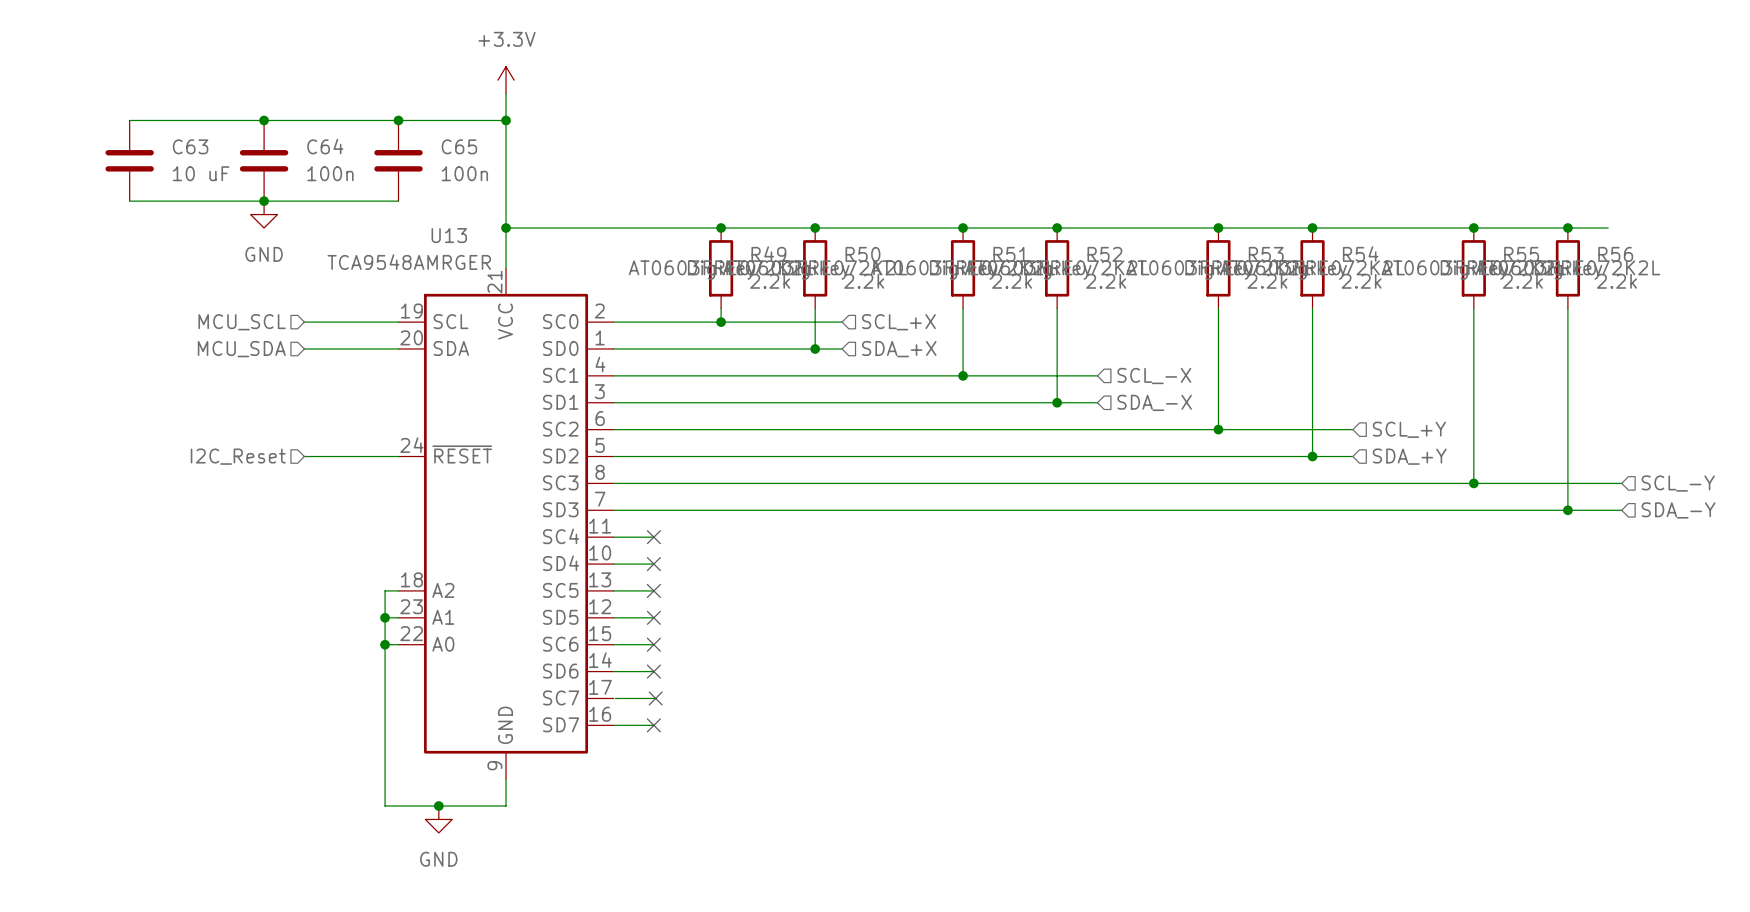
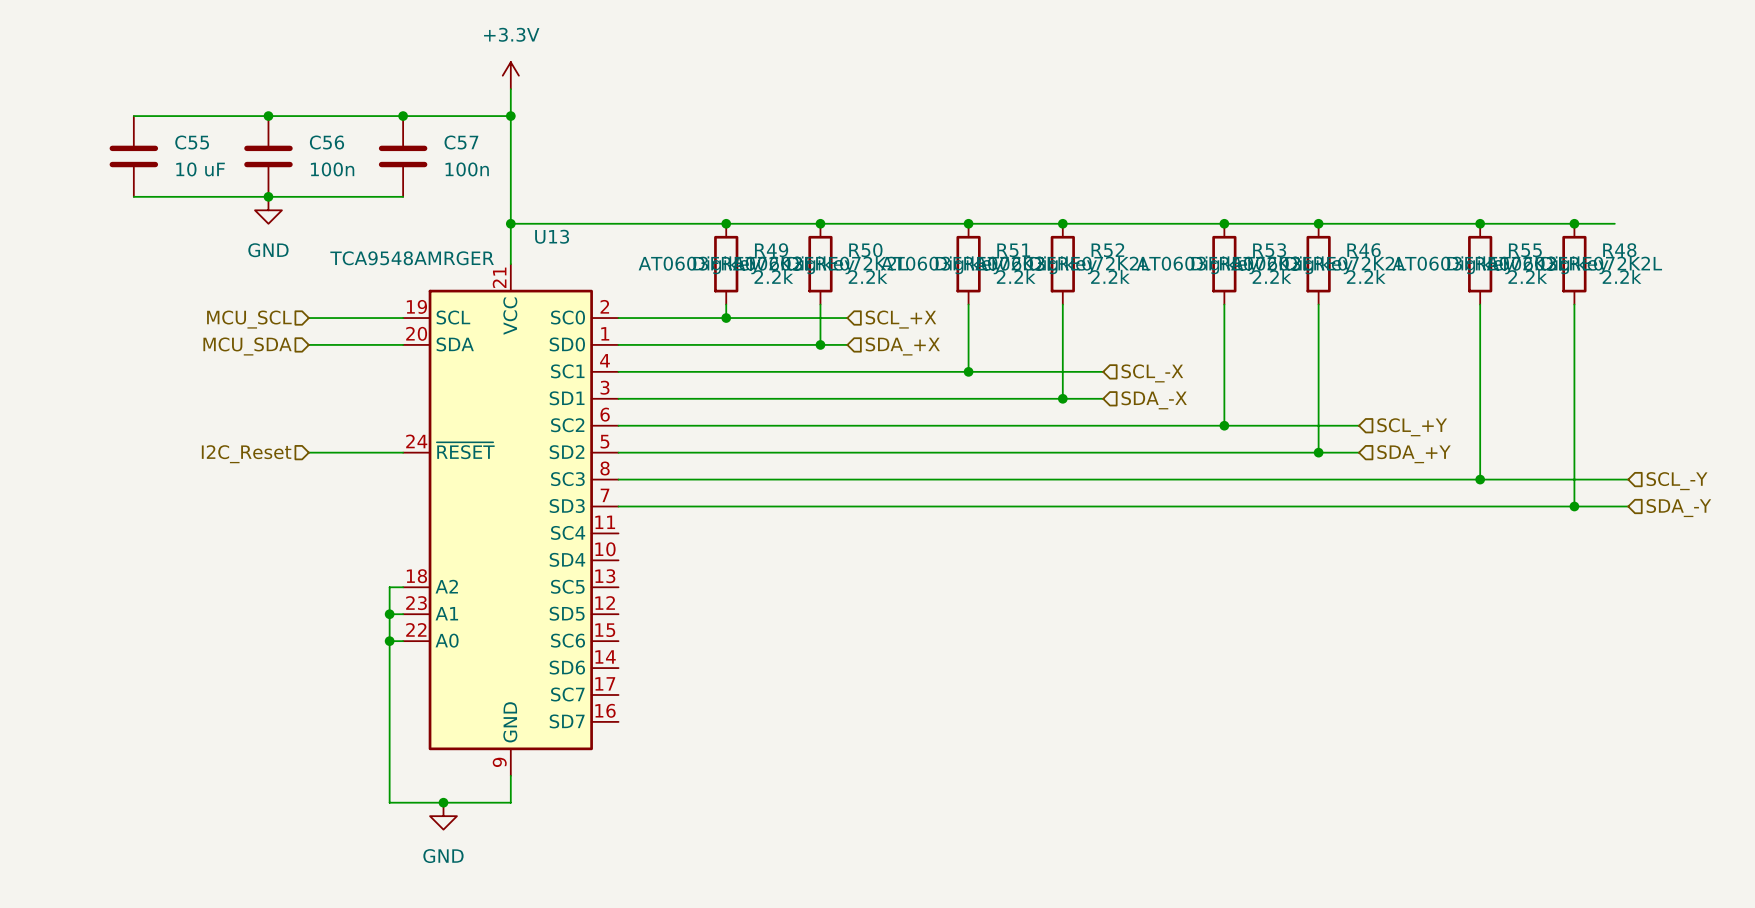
C63 name: C63 (190, 146) -> C55 (192, 142)
C64 name: C64 (325, 146) -> C56 (326, 142)
C65 name: C65 (459, 146) -> C57 (461, 142)
U13 name position: U13 (449, 235) -> U13 (552, 236)
R54 name: R54 (1360, 254) -> R46 (1364, 250)
R56 name: R56 (1615, 254) -> R48 (1619, 250)
wire: (613, 537) (653, 537) -> none
no-connect mark: (653, 537) -> none
wire: (613, 564) (653, 564) -> none
no-connect mark: (653, 564) -> none
wire: (613, 590) (653, 590) -> none
no-connect mark: (653, 590) -> none
wire: (613, 617) (653, 617) -> none
no-connect mark: (653, 617) -> none
wire: (613, 644) (653, 644) -> none
no-connect mark: (653, 644) -> none
wire: (613, 671) (653, 671) -> none
no-connect mark: (653, 671) -> none
wire: (615, 698) (655, 698) -> none
no-connect mark: (655, 698) -> none
wire: (613, 725) (653, 725) -> none
no-connect mark: (653, 725) -> none

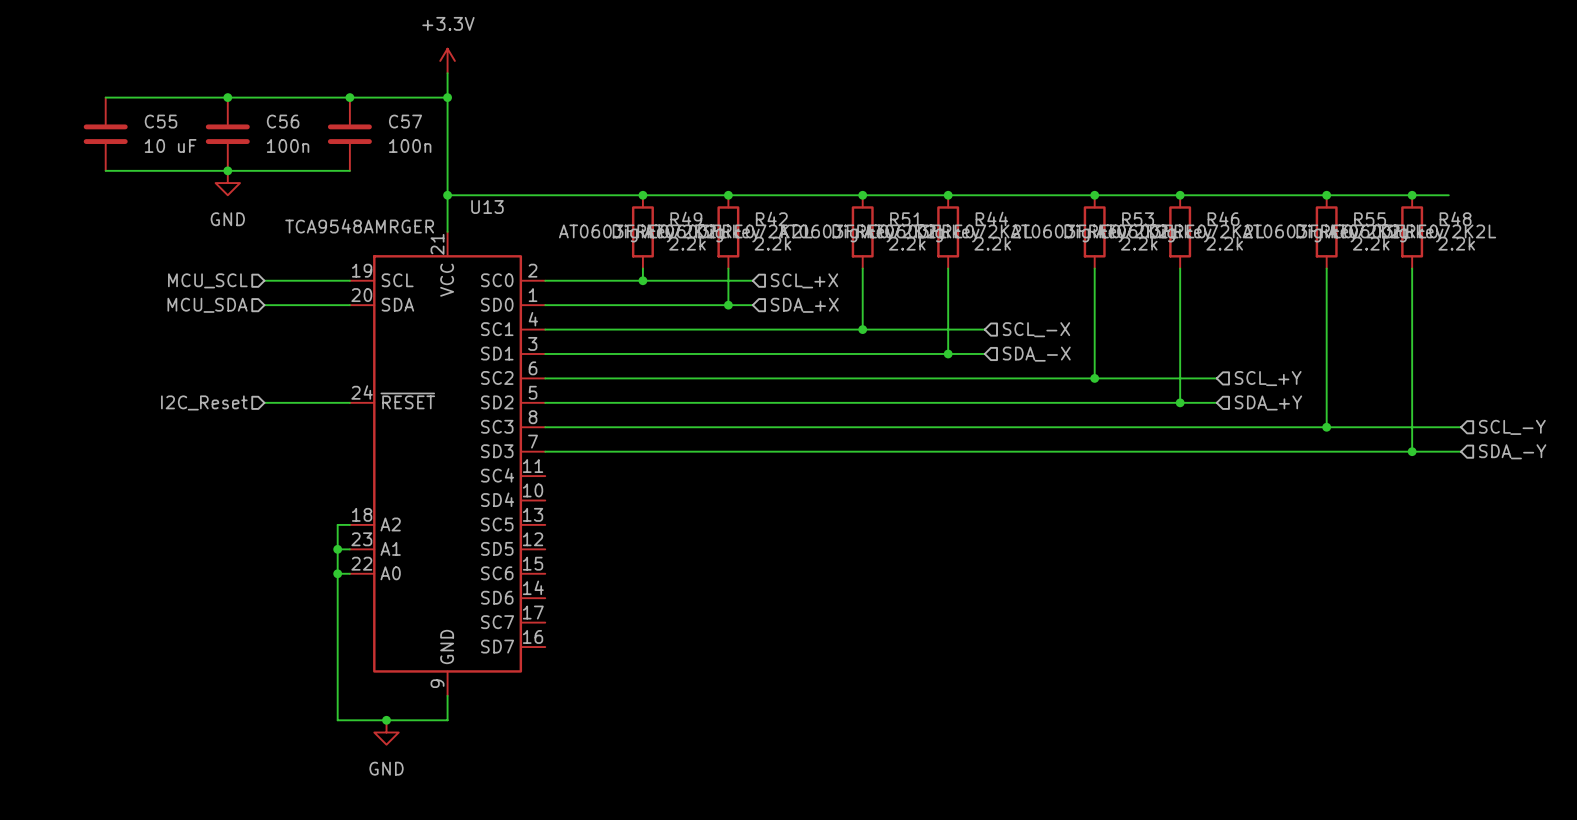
R50 name: R50 (865, 250) -> R42 (771, 218)
R52 name: R52 (1107, 250) -> R44 (991, 218)

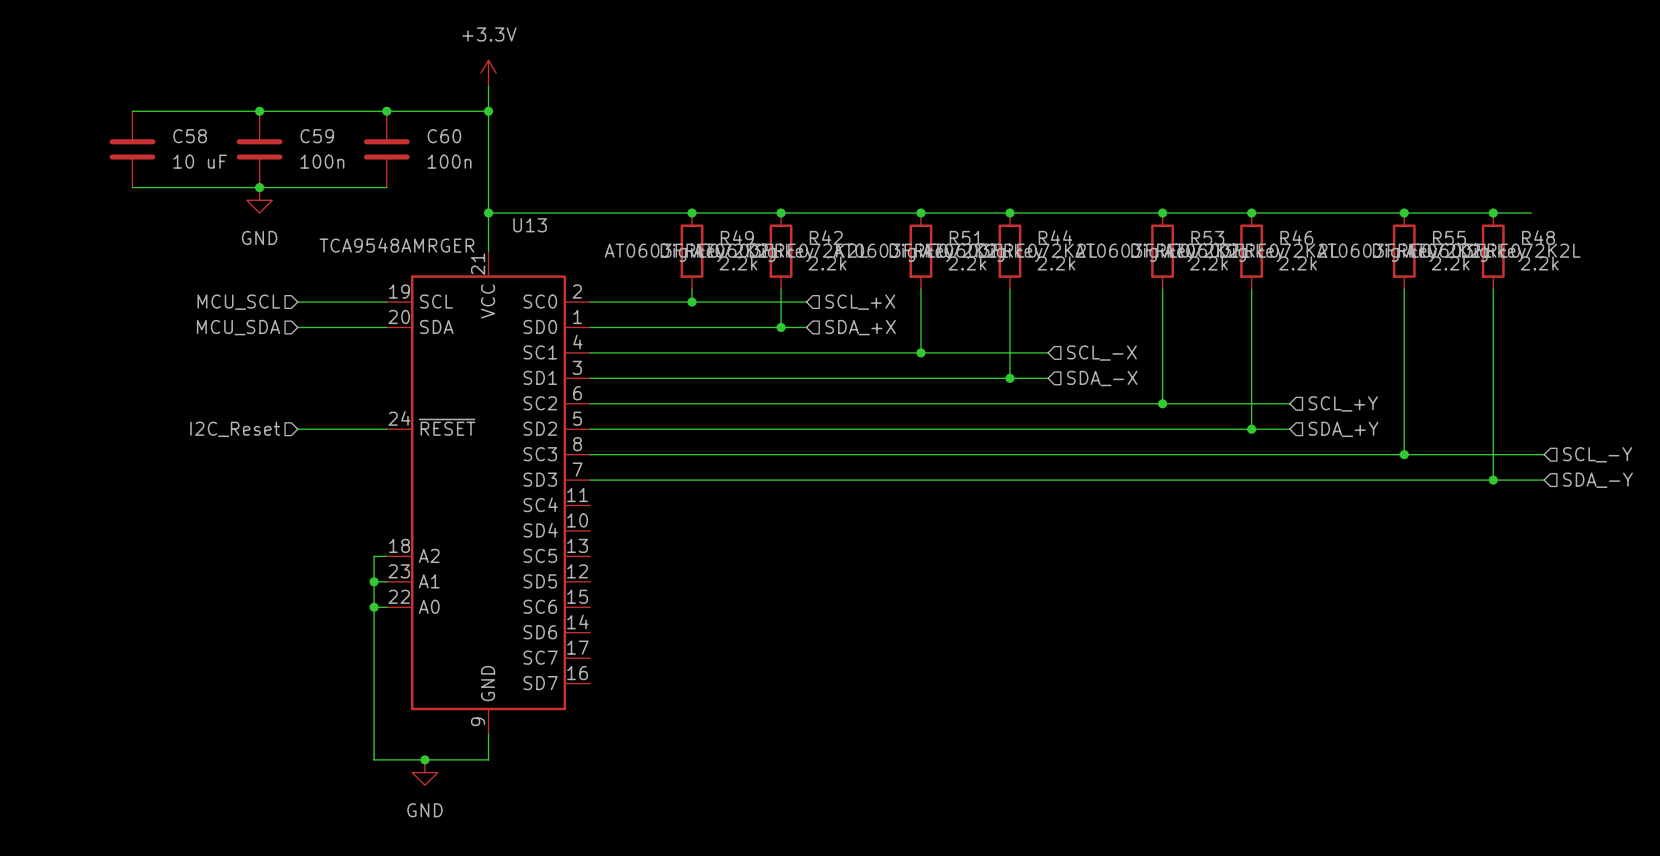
C55 name: C55 (161, 121) -> C58 (190, 136)
C56 name: C56 (283, 121) -> C59 (317, 136)
C57 name: C57 (405, 121) -> C60 (444, 136)

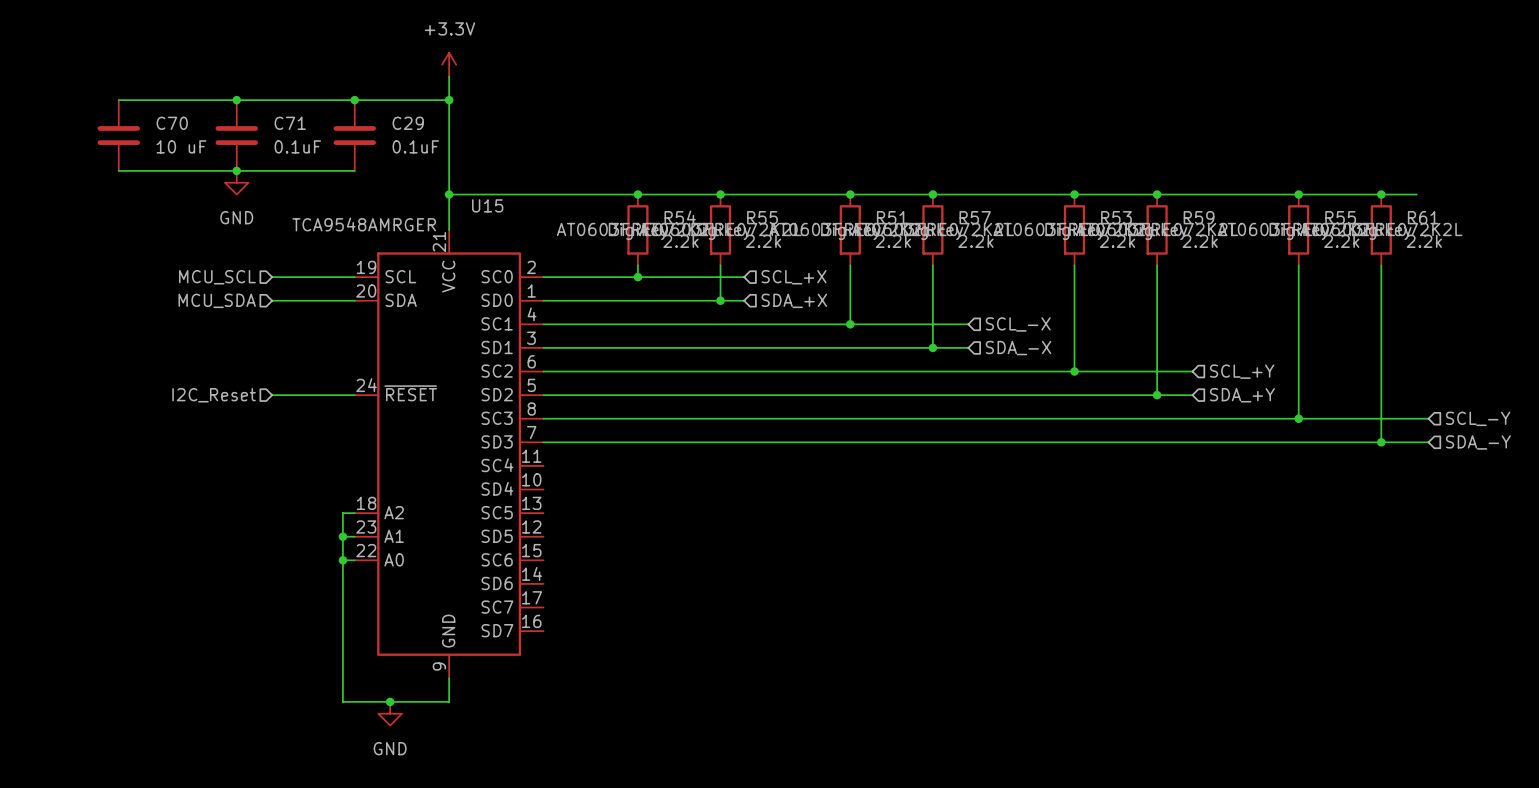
C58 name: C58 (190, 136) -> C70 (172, 123)
C59 name: C59 (317, 136) -> C71 (290, 123)
C60 name: C60 (444, 136) -> C29 (408, 123)
C59 value: 100n (322, 161) -> 0.1uF (297, 146)
C60 value: 100n (449, 161) -> 0.1uF (415, 146)
U13 name: U13 (530, 225) -> U15 (487, 205)
R49 name: R49 (737, 237) -> R54 (680, 217)
R42 name: R42 (826, 237) -> R55 (762, 217)
R44 name: R44 (1055, 237) -> R57 (975, 217)
R46 name: R46 (1296, 237) -> R59 (1199, 217)
R48 name: R48 (1538, 237) -> R61 (1423, 217)

